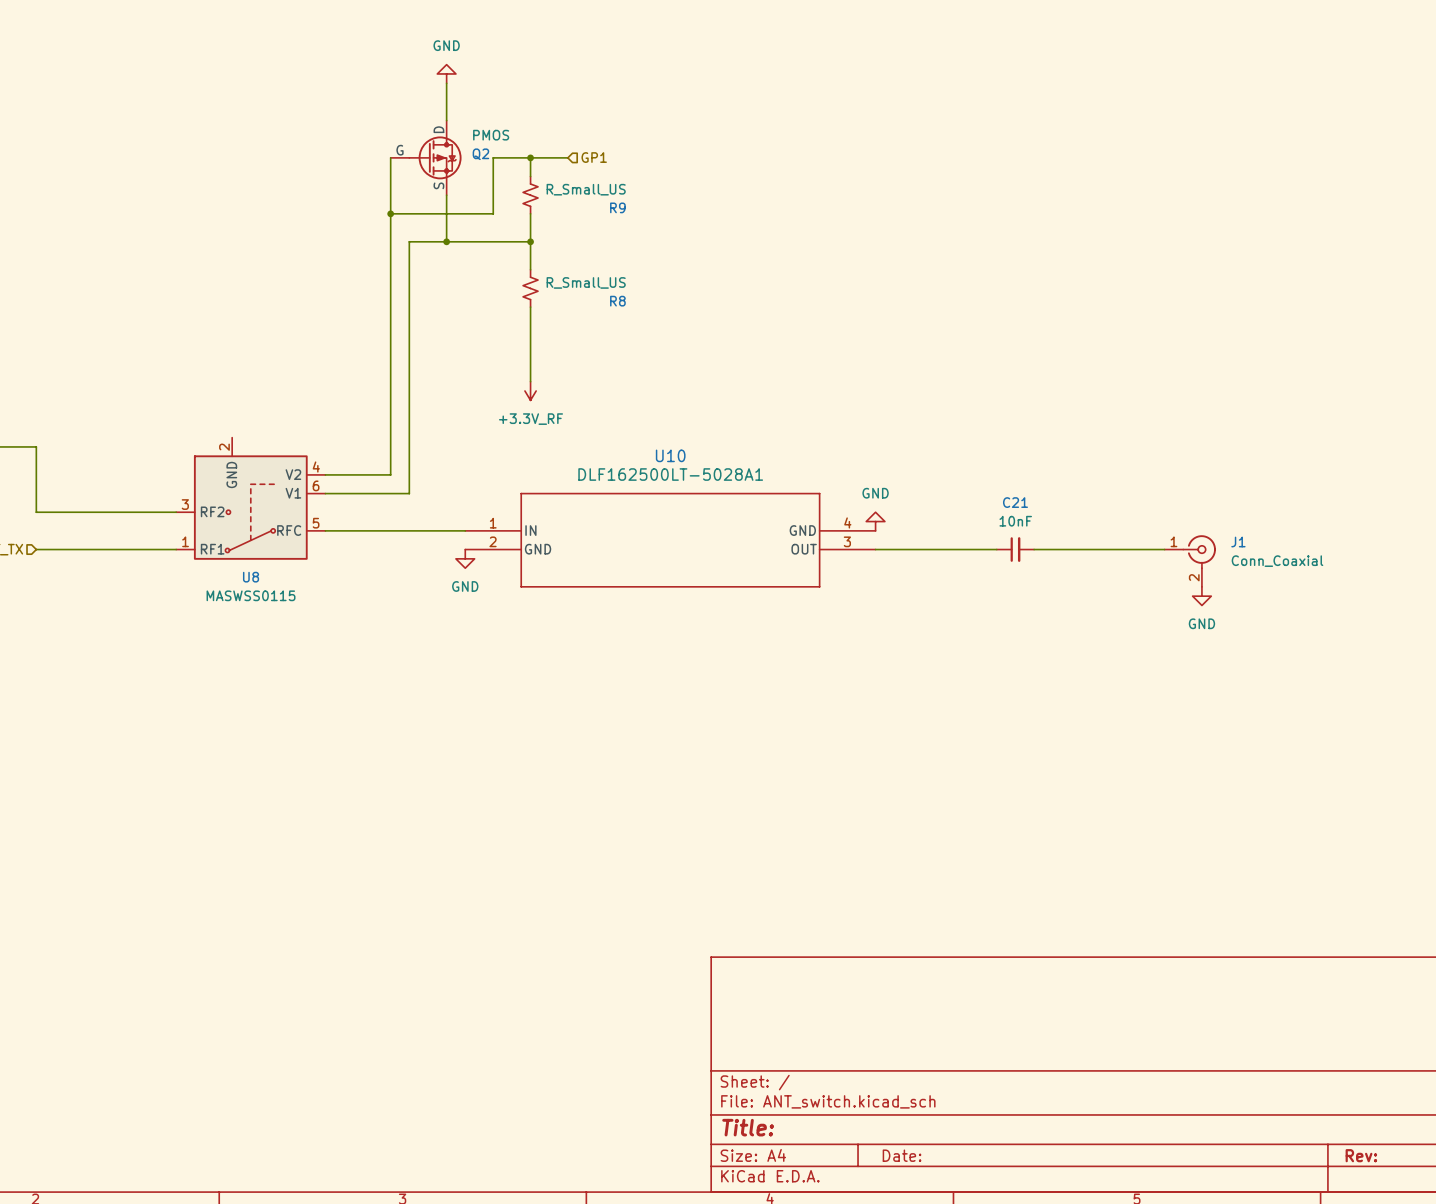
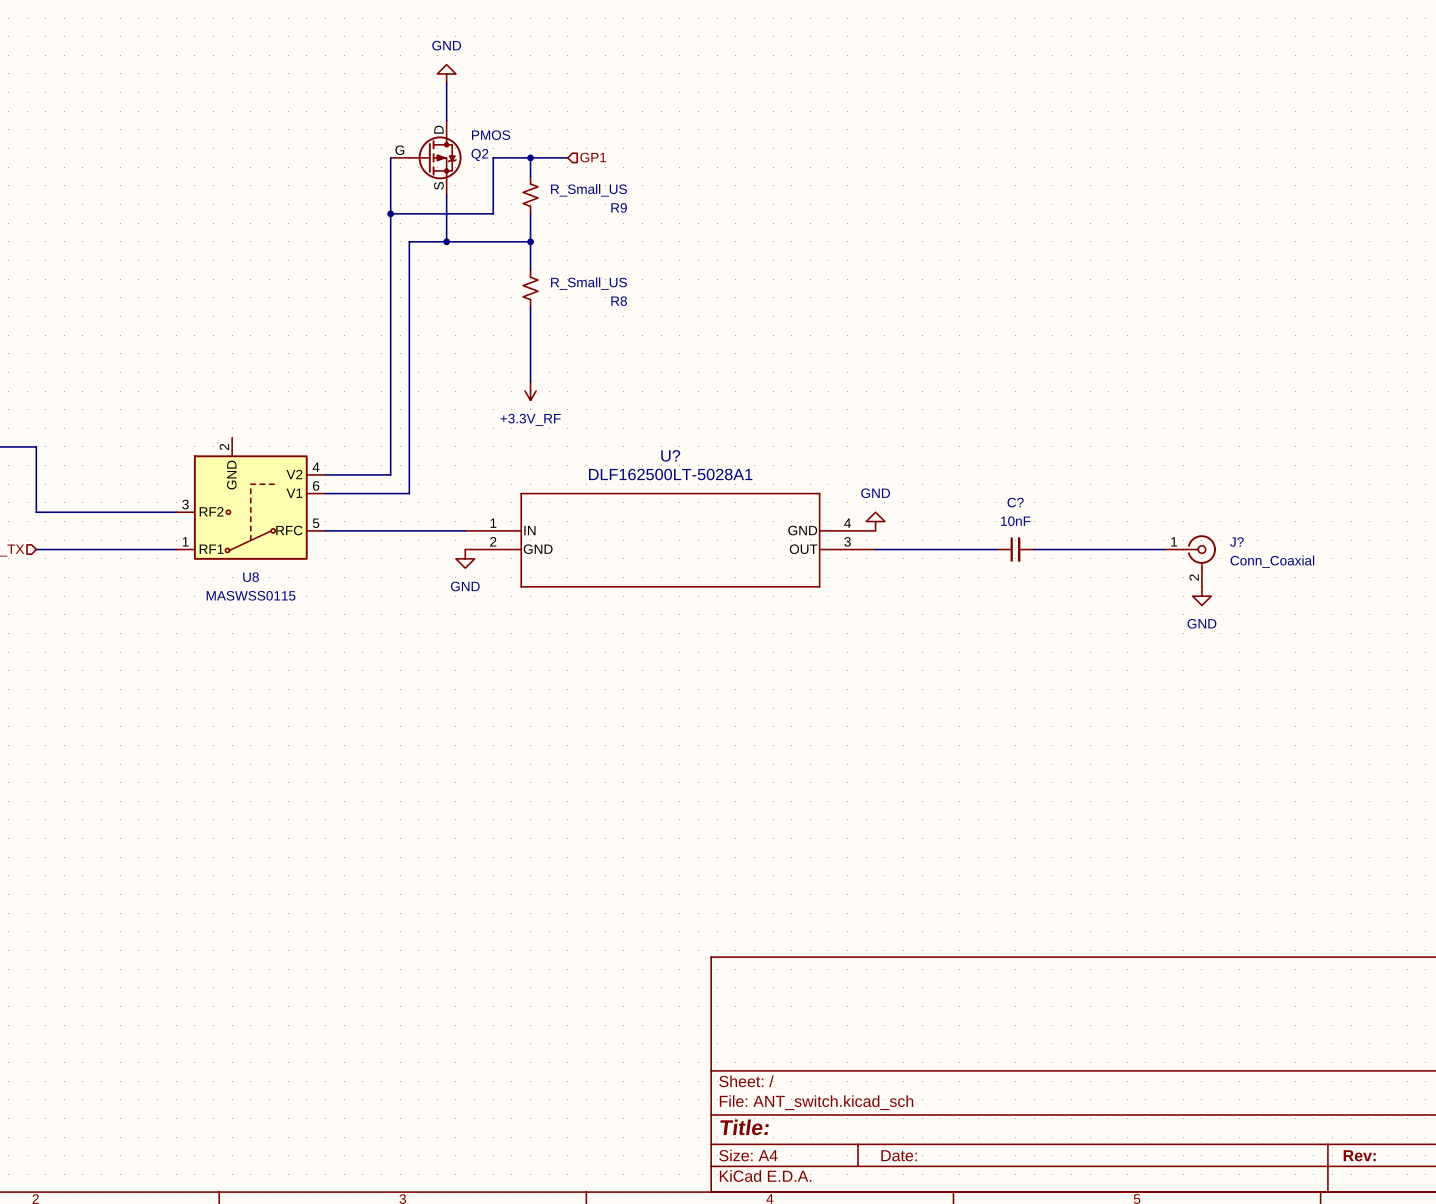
U10 name: U10 (670, 455) -> U? (670, 455)
C21 name: C21 (1015, 502) -> C? (1015, 502)
J1 name: J1 (1238, 542) -> J? (1236, 542)

